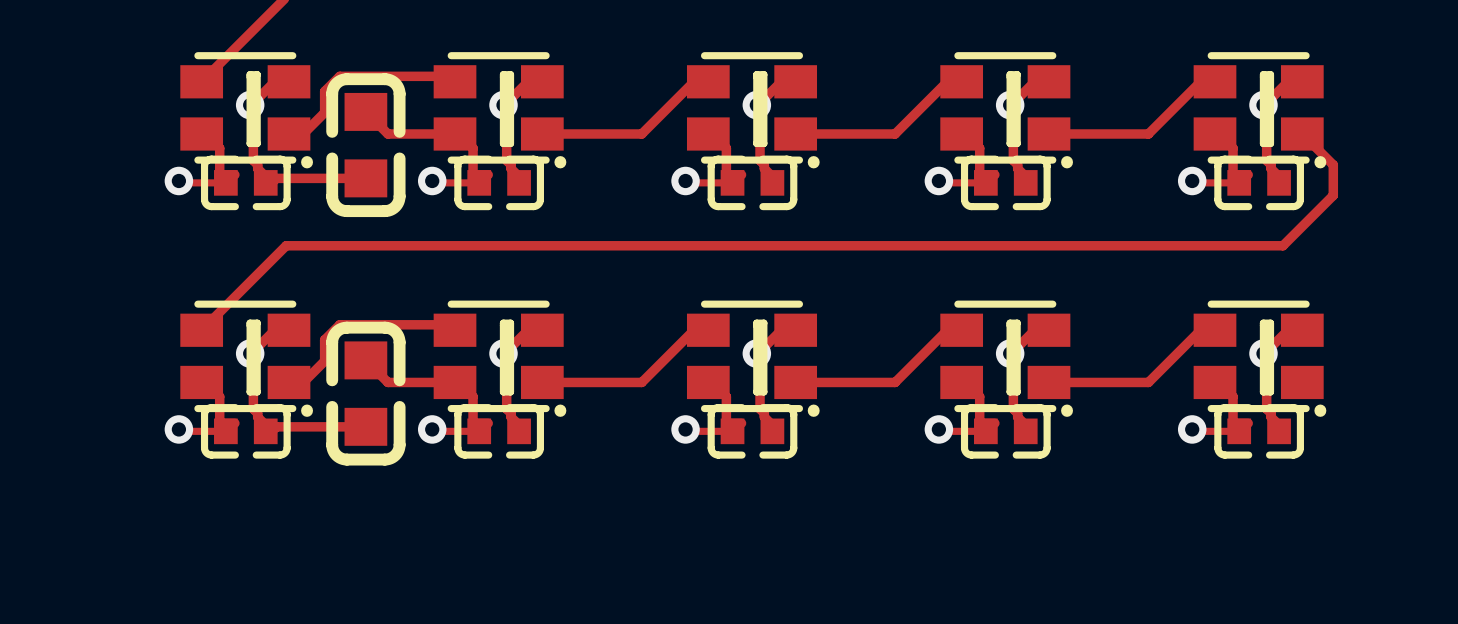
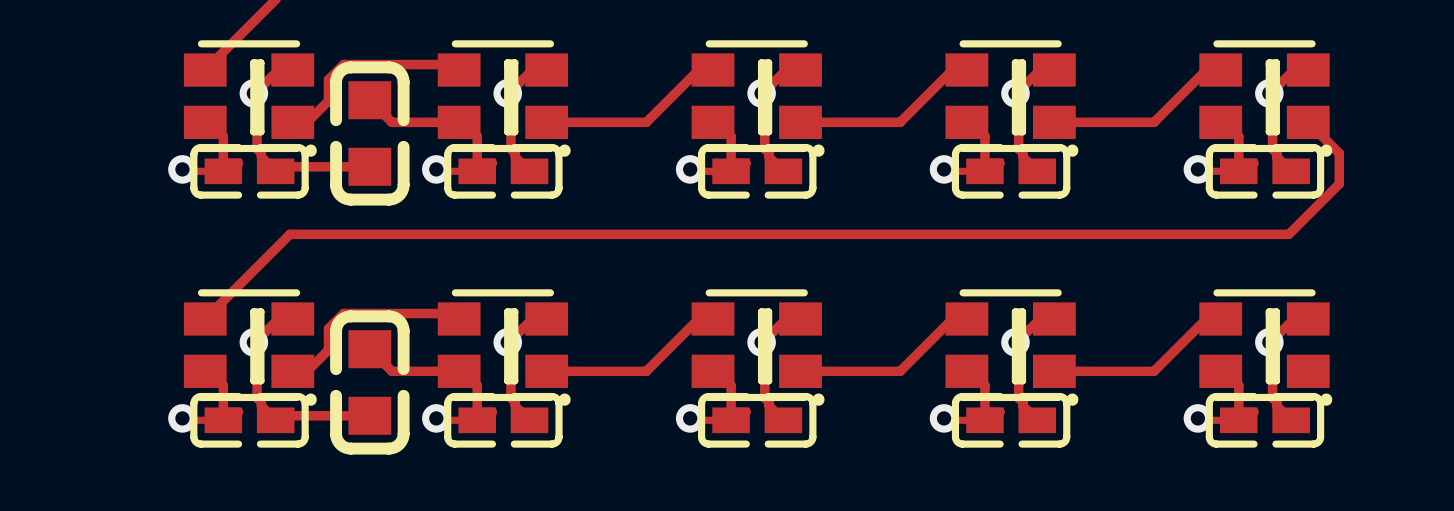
part footprint: [200, 155, 291, 211] -> [190, 143, 309, 199]
part footprint: [454, 155, 545, 211] -> [444, 143, 563, 199]
part footprint: [707, 155, 798, 211] -> [698, 143, 817, 199]
part footprint: [960, 155, 1051, 211] -> [951, 143, 1071, 199]
part footprint: [1214, 155, 1304, 211] -> [1205, 143, 1325, 199]
part footprint: [200, 404, 291, 459] -> [190, 392, 309, 448]
part footprint: [454, 404, 545, 459] -> [444, 392, 563, 448]
part footprint: [707, 404, 798, 459] -> [698, 392, 817, 448]
part footprint: [960, 404, 1051, 459] -> [951, 392, 1071, 448]
part footprint: [1214, 404, 1304, 459] -> [1205, 392, 1325, 448]

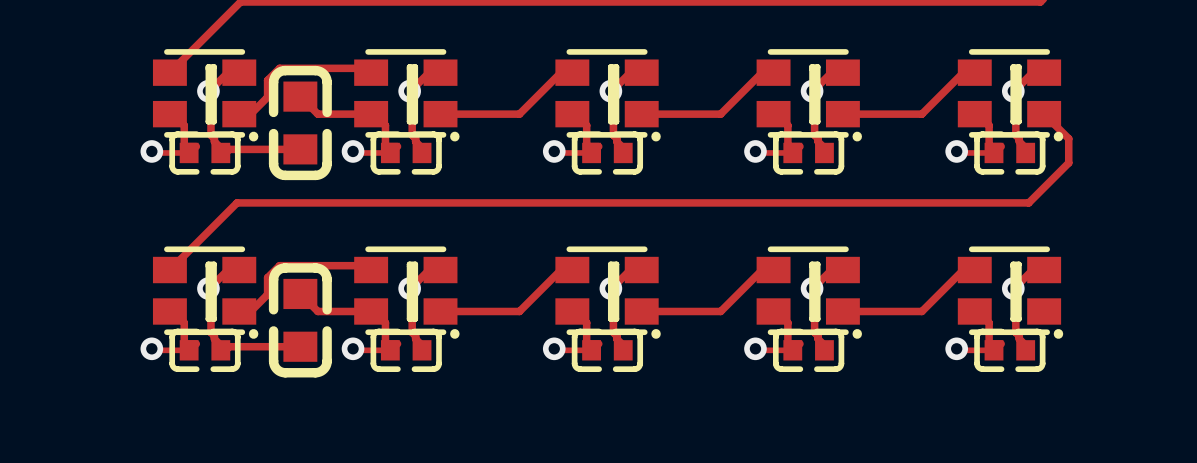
part footprint: [190, 143, 309, 199] -> [169, 131, 241, 175]
part footprint: [444, 143, 563, 199] -> [370, 131, 442, 175]
part footprint: [698, 143, 817, 199] -> [571, 131, 644, 175]
part footprint: [951, 143, 1071, 199] -> [773, 131, 845, 175]
part footprint: [1205, 143, 1325, 199] -> [974, 131, 1046, 175]
part footprint: [190, 392, 309, 448] -> [169, 328, 241, 372]
part footprint: [444, 392, 563, 448] -> [370, 328, 442, 372]
part footprint: [698, 392, 817, 448] -> [571, 328, 644, 372]
part footprint: [951, 392, 1071, 448] -> [773, 328, 845, 372]
part footprint: [1205, 392, 1325, 448] -> [974, 328, 1046, 372]

